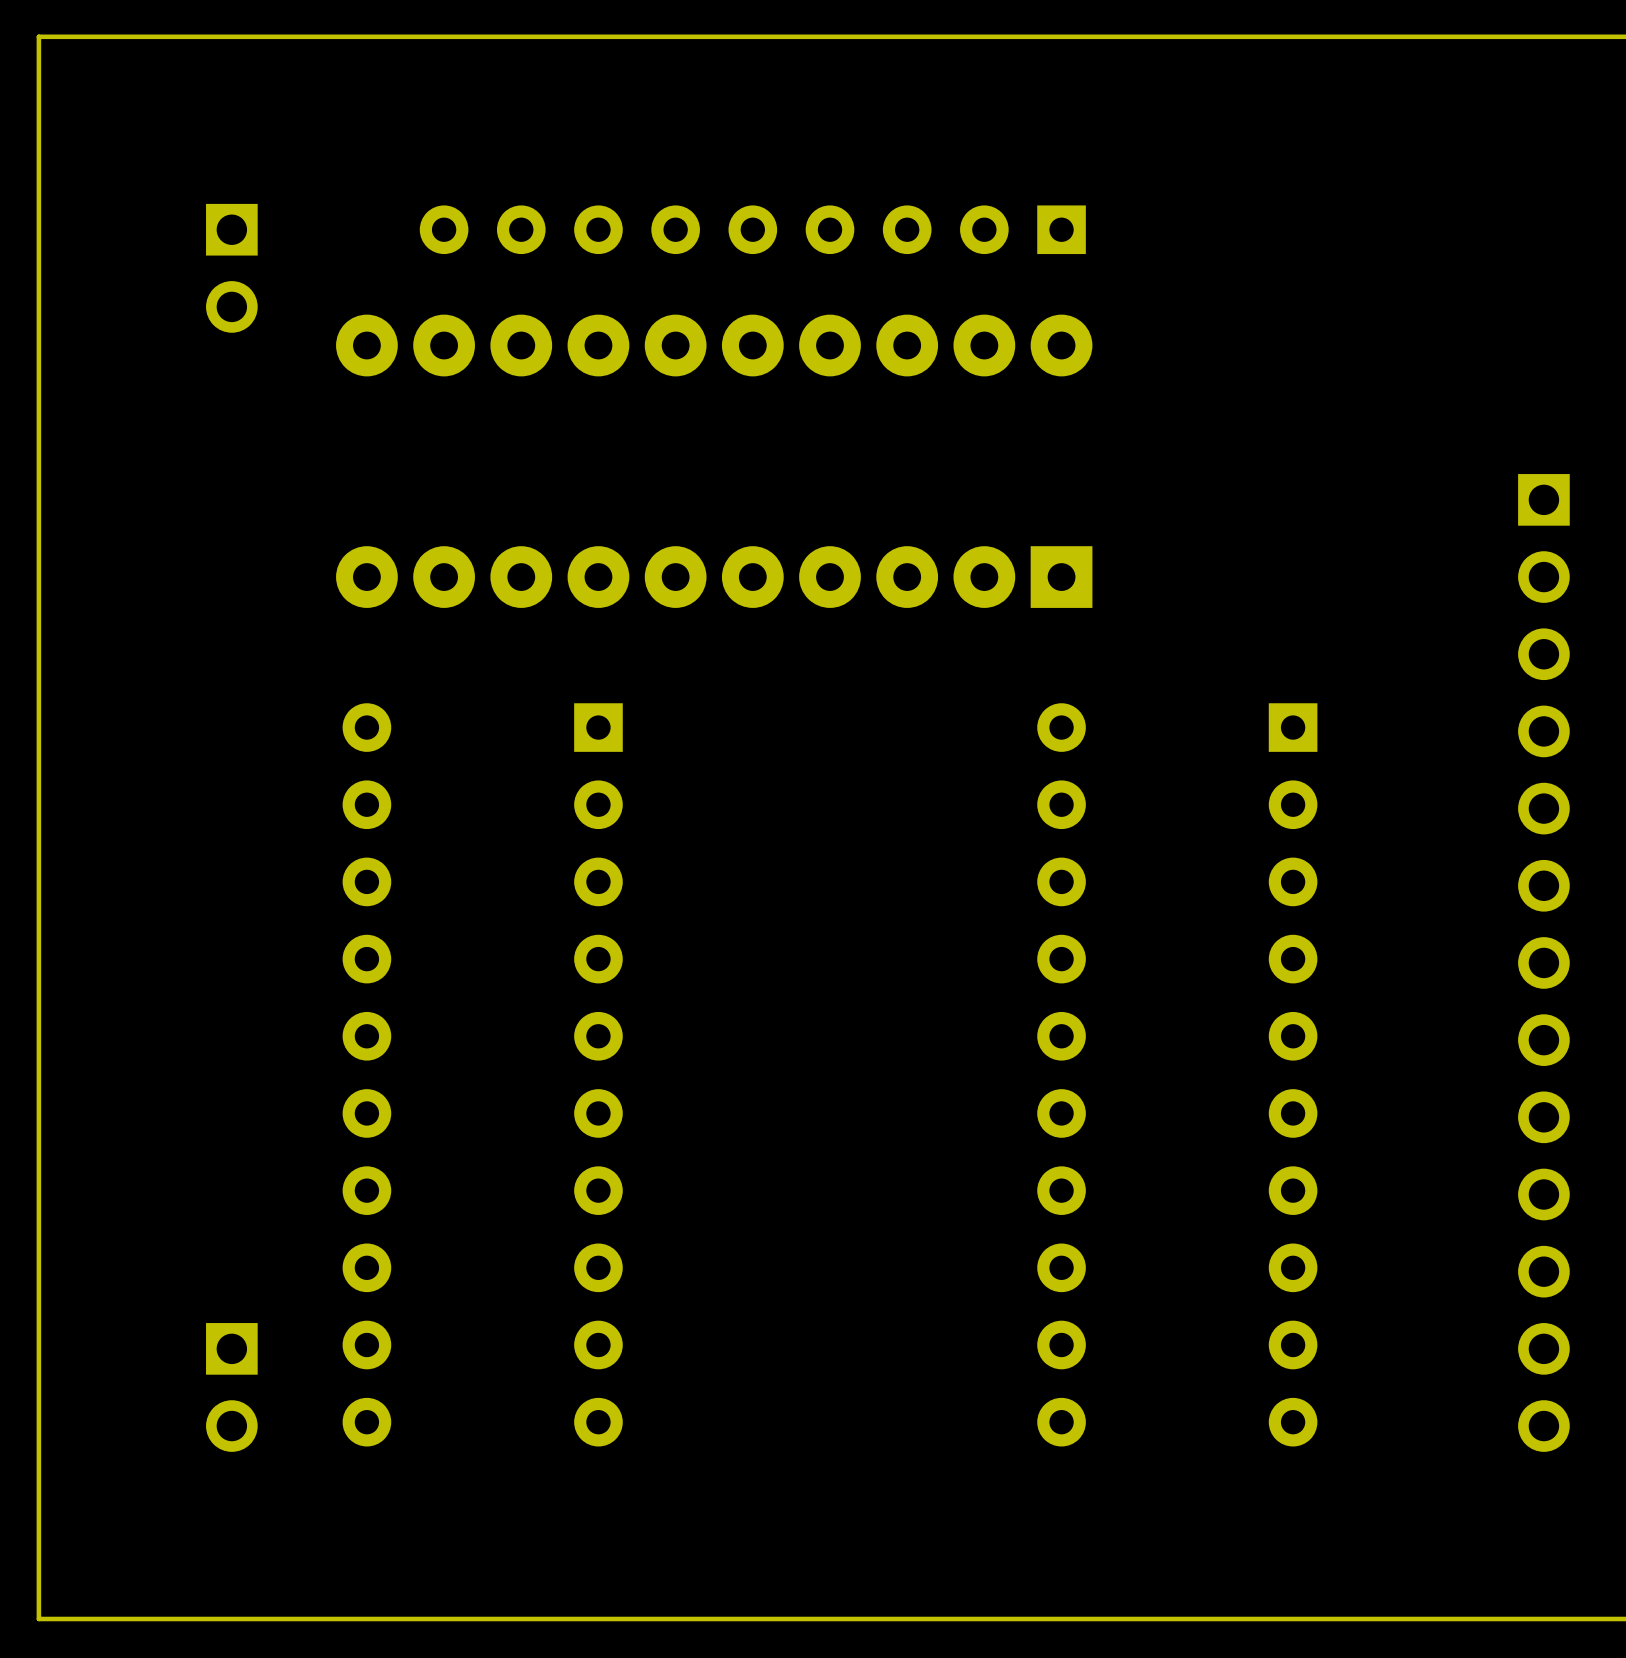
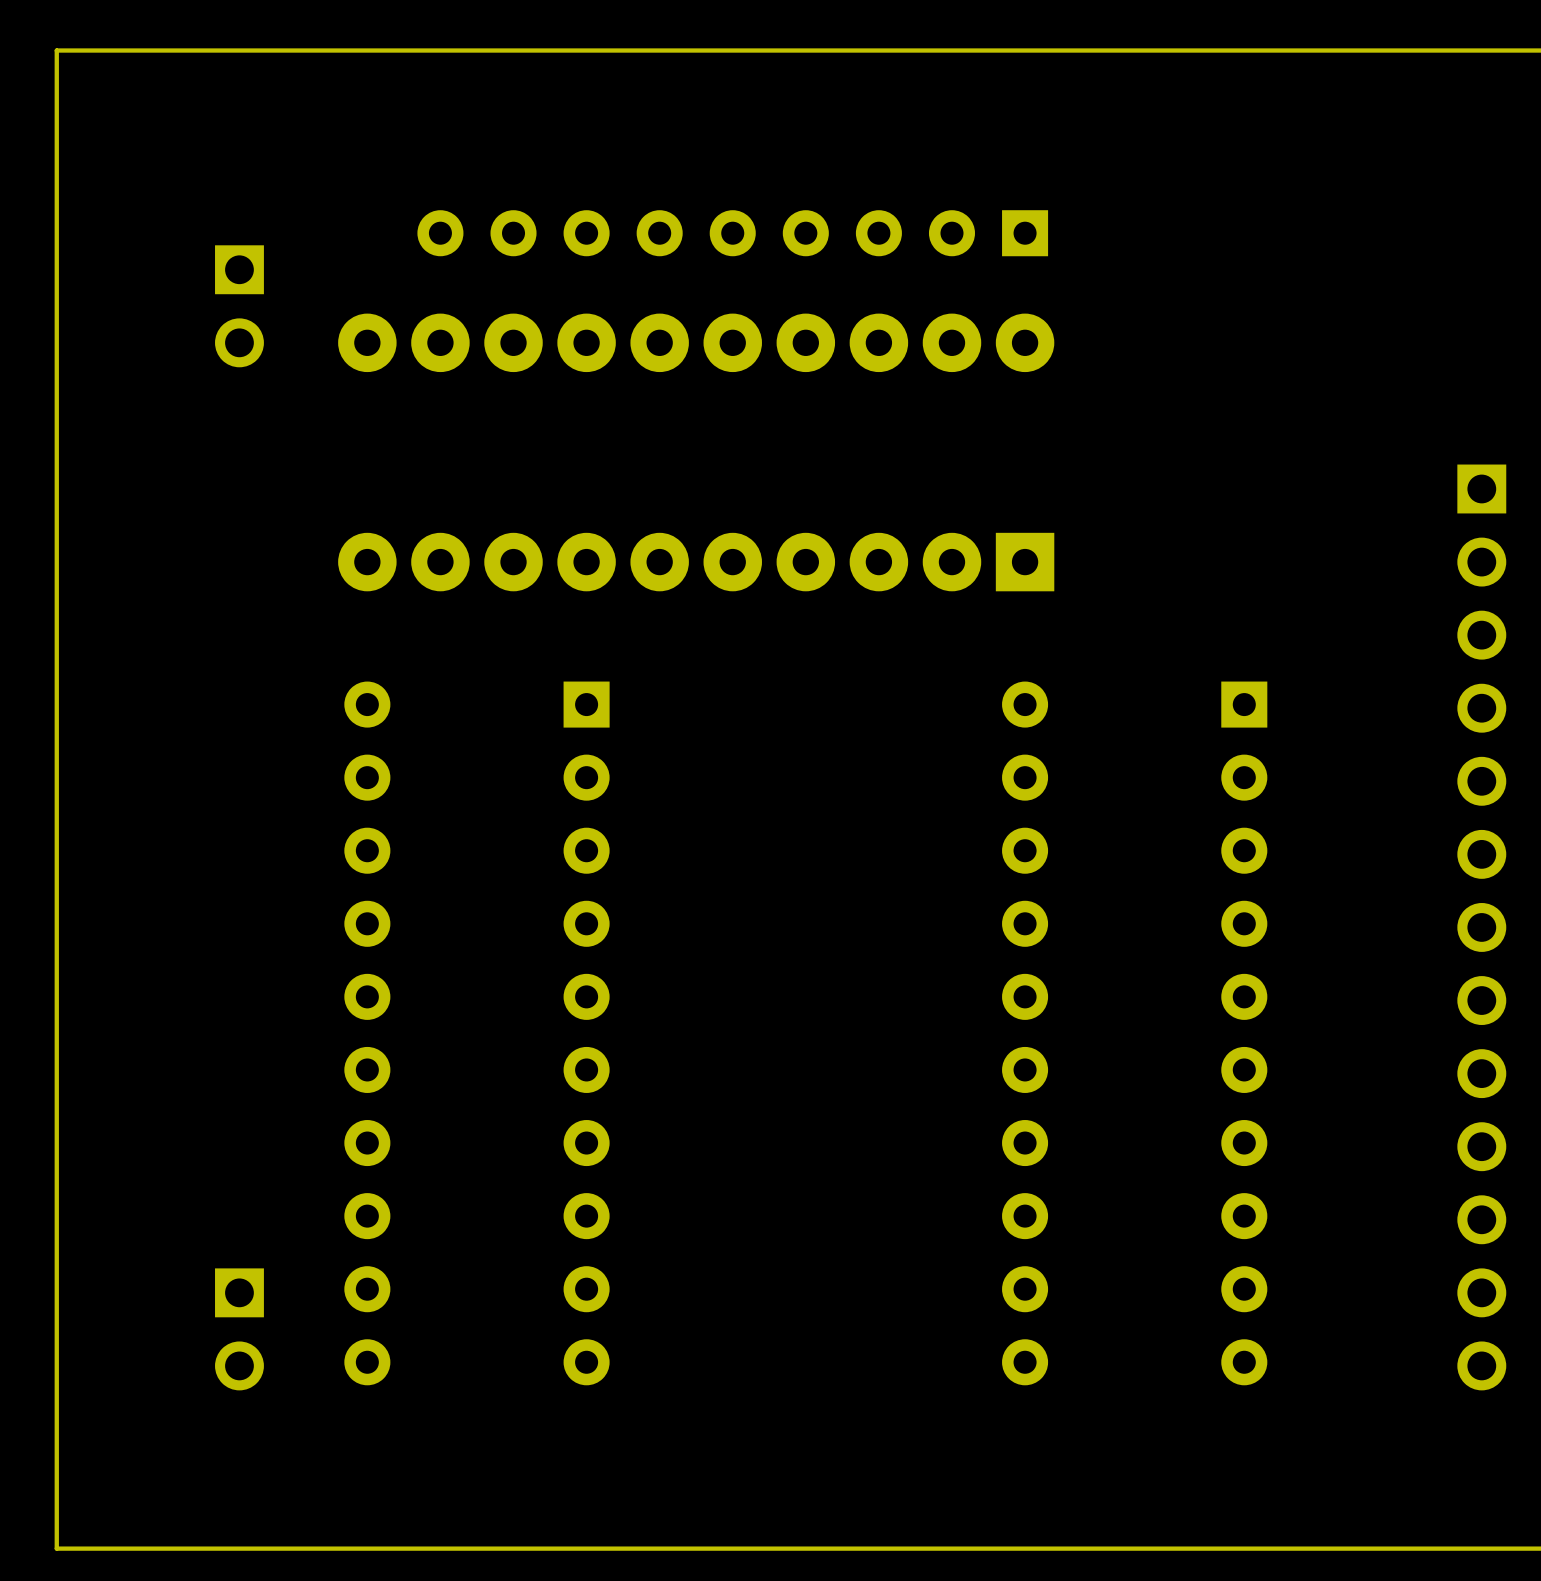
part position: (231, 268) -> (239, 306)

